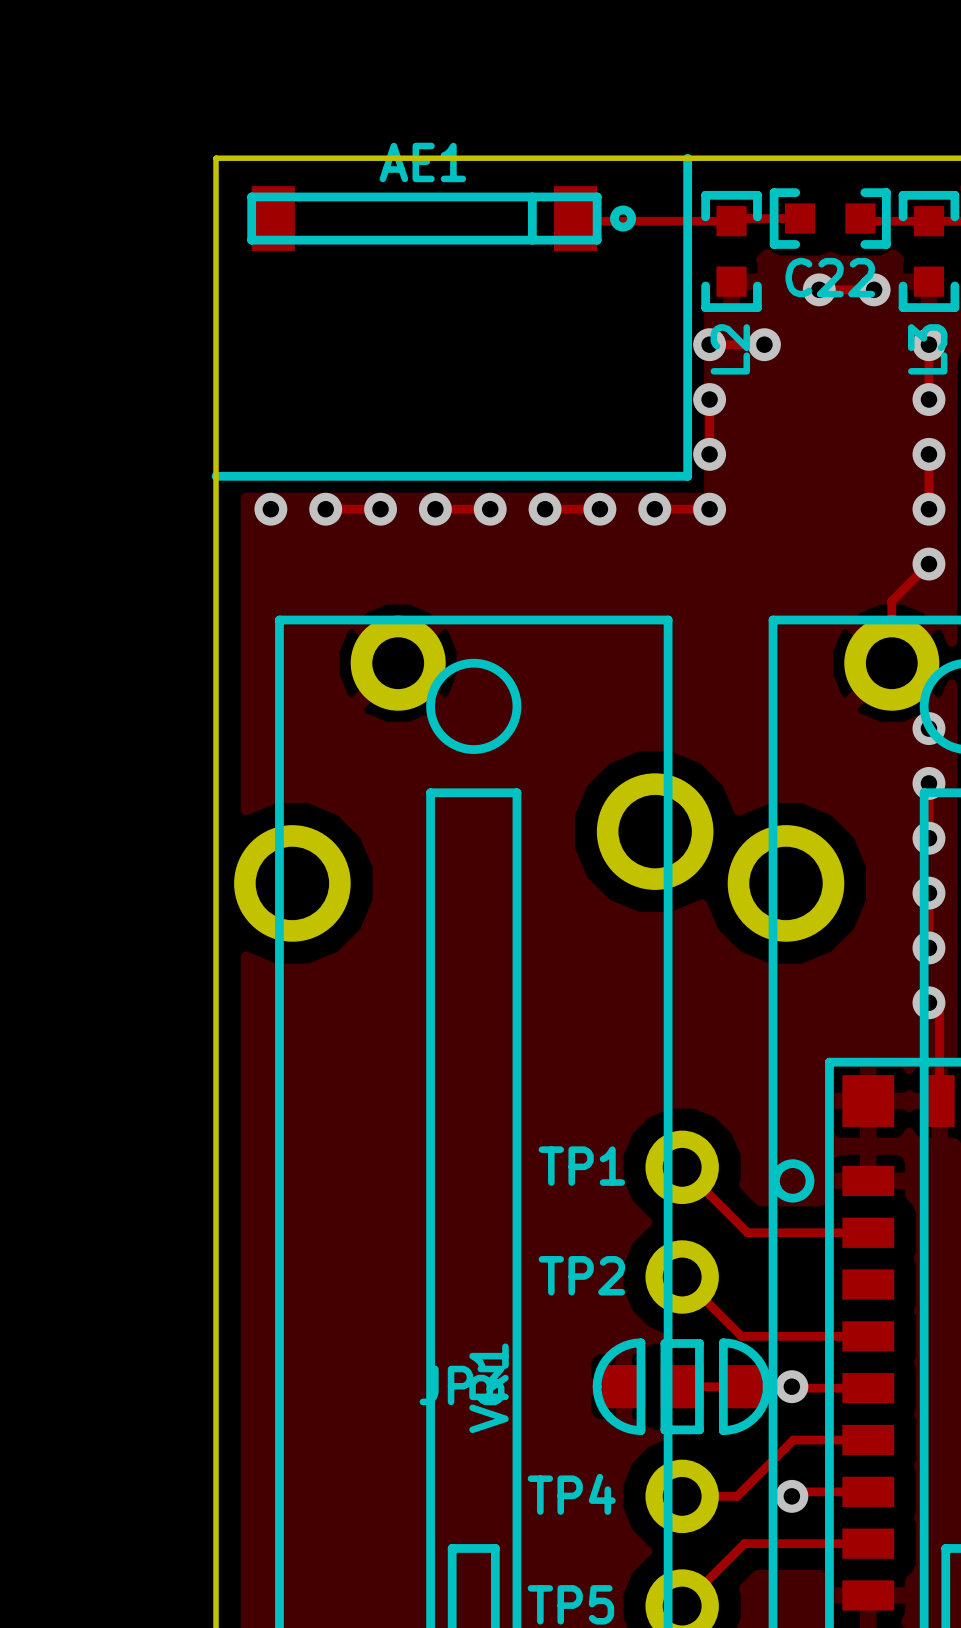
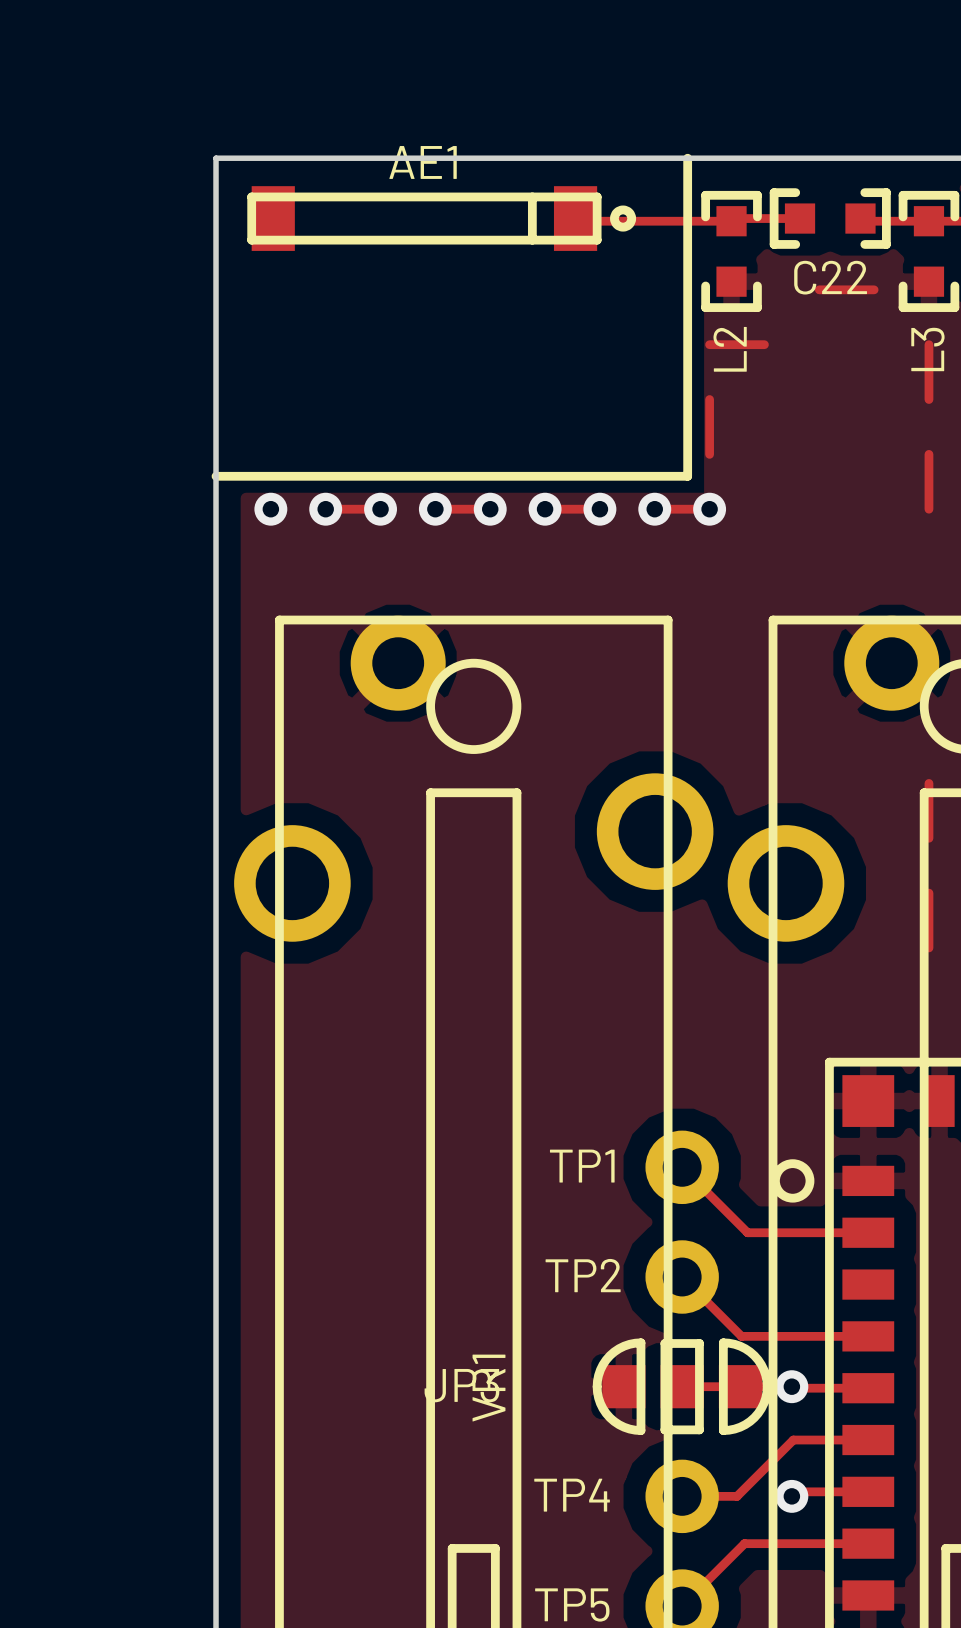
via: (819, 289) -> none
via: (874, 289) -> none
via: (709, 344) -> none
via: (764, 344) -> none
via: (928, 344) -> none
via: (709, 399) -> none
via: (928, 399) -> none
via: (709, 454) -> none
via: (928, 454) -> none
via: (928, 509) -> none
track: (928, 564) (891, 601) (891, 663) -> none
via: (928, 564) -> none
via: (928, 728) -> none
via: (928, 783) -> none
via: (928, 838) -> none
via: (928, 893) -> none
via: (928, 947) -> none
track: (928, 1002) (939, 1013) (939, 1101) -> none
via: (928, 1002) -> none

